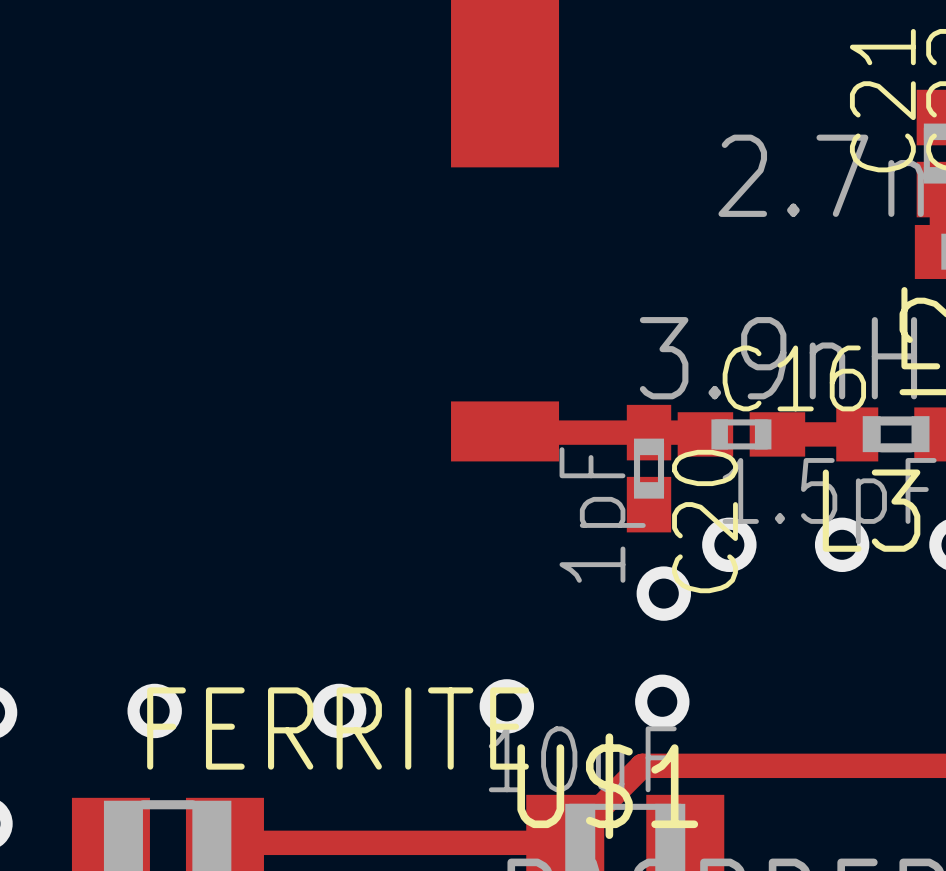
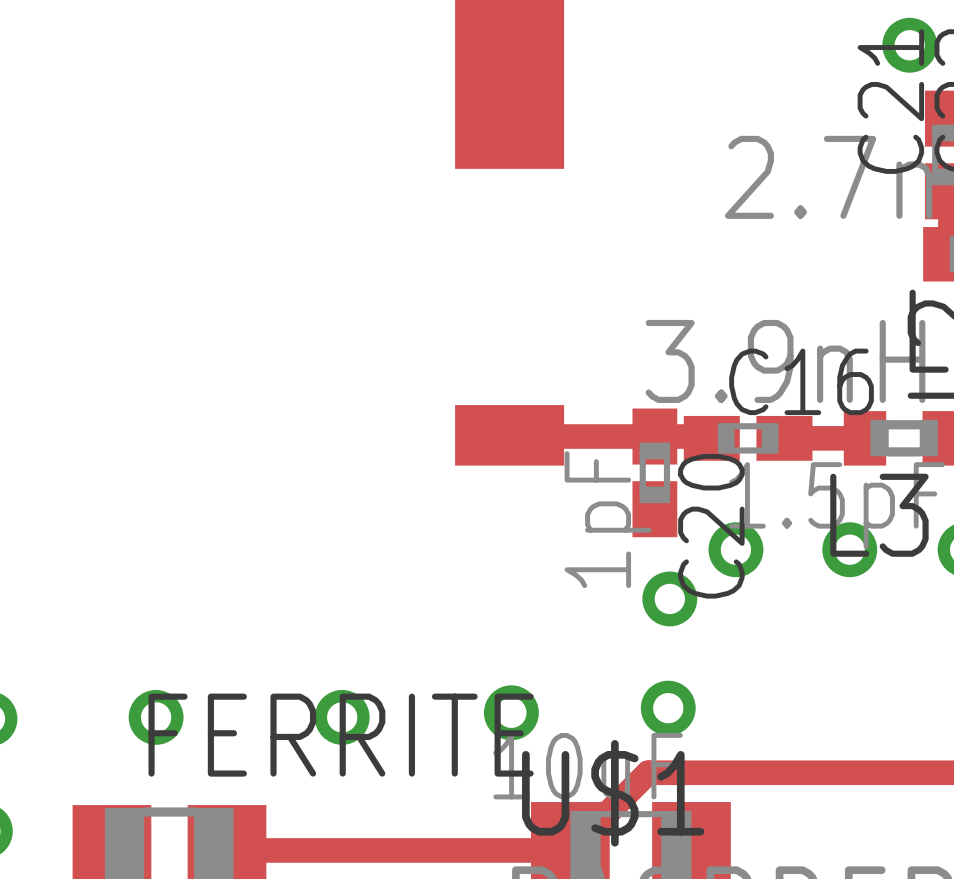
via: none -> (909, 45)

